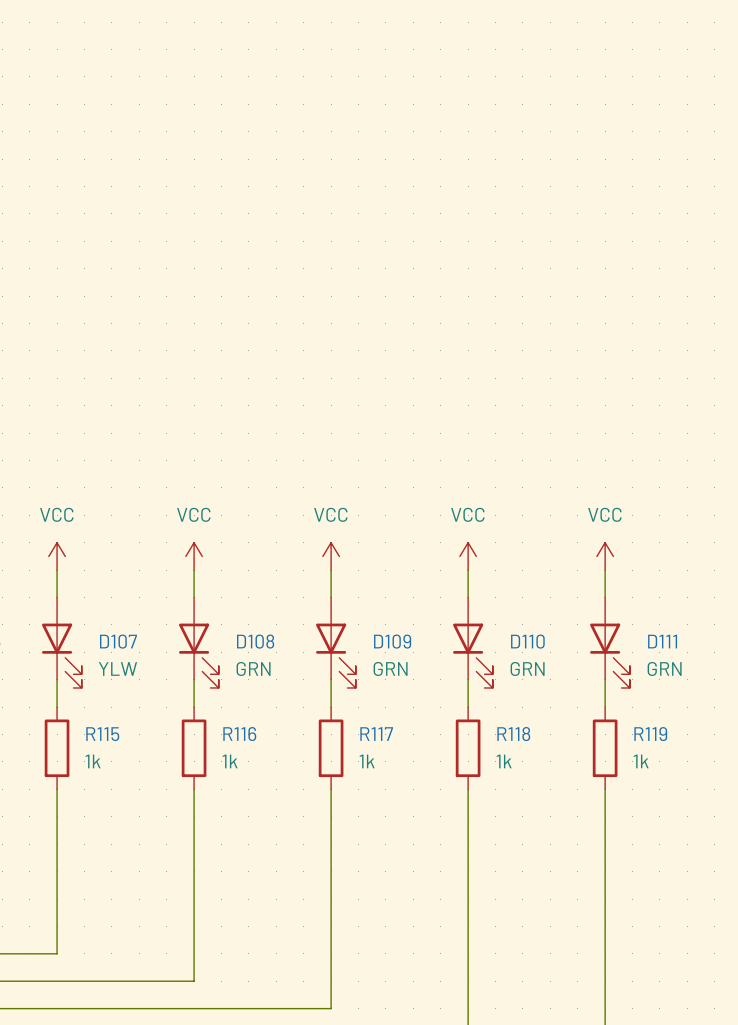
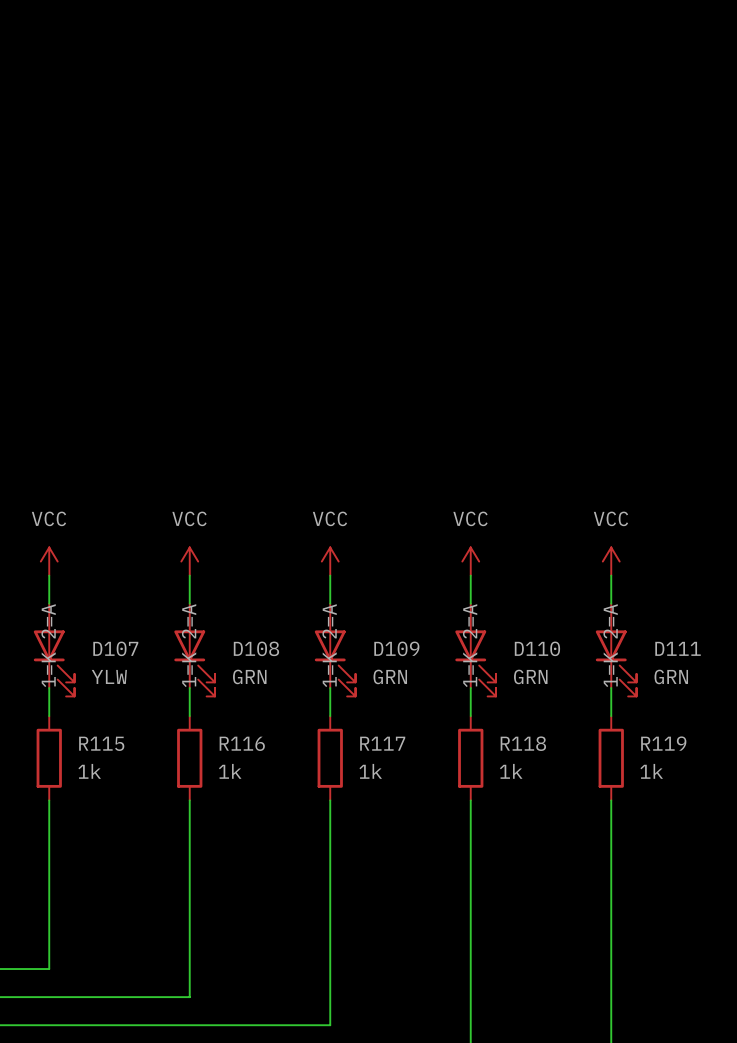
D107 text: none -> 1=K 2=A (48, 645)
D108 text: none -> 1=K 2=A (189, 645)
D109 text: none -> 1=K 2=A (329, 645)
D110 text: none -> 1=K 2=A (470, 645)
D111 text: none -> 1=K 2=A (610, 645)

